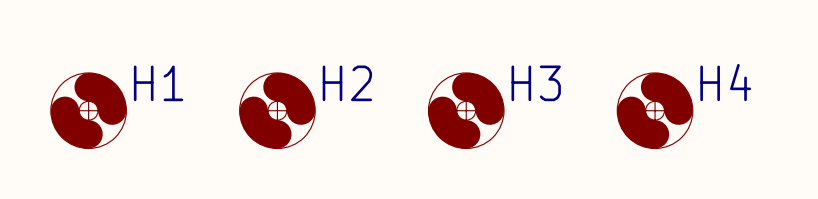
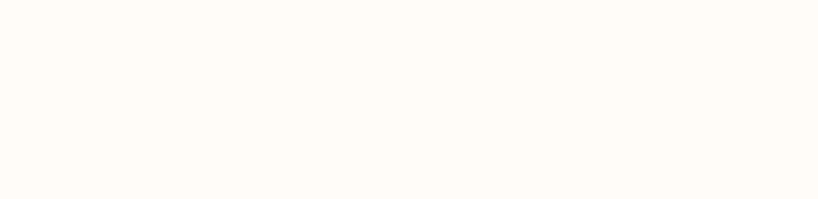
H1: (88, 110) -> none
H2: (277, 110) -> none
H3: (466, 110) -> none
H4: (655, 110) -> none

